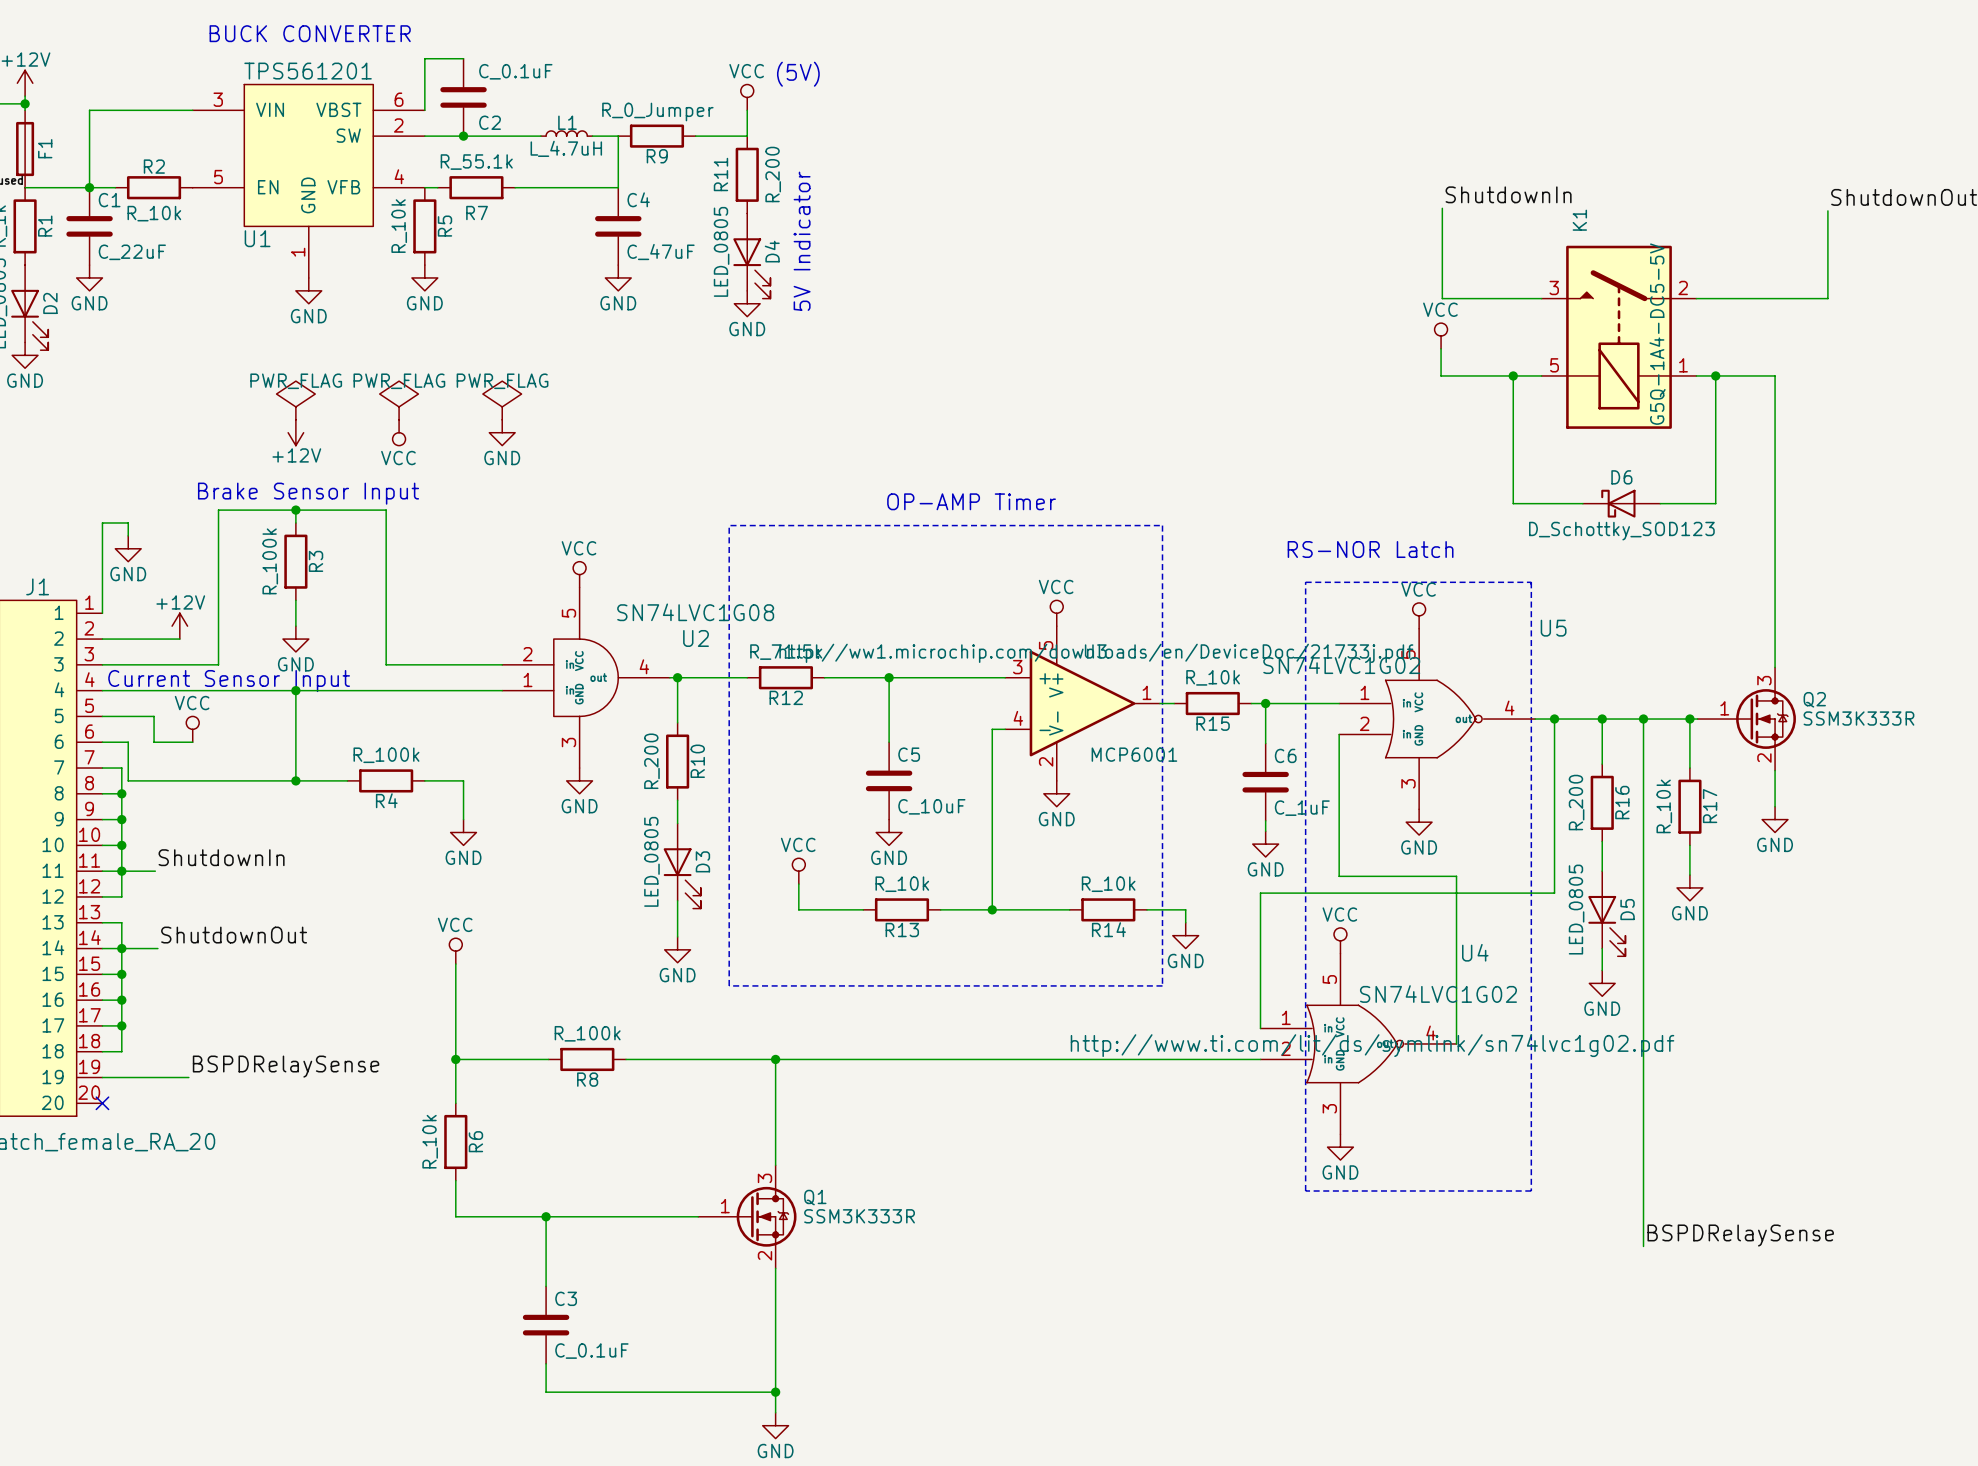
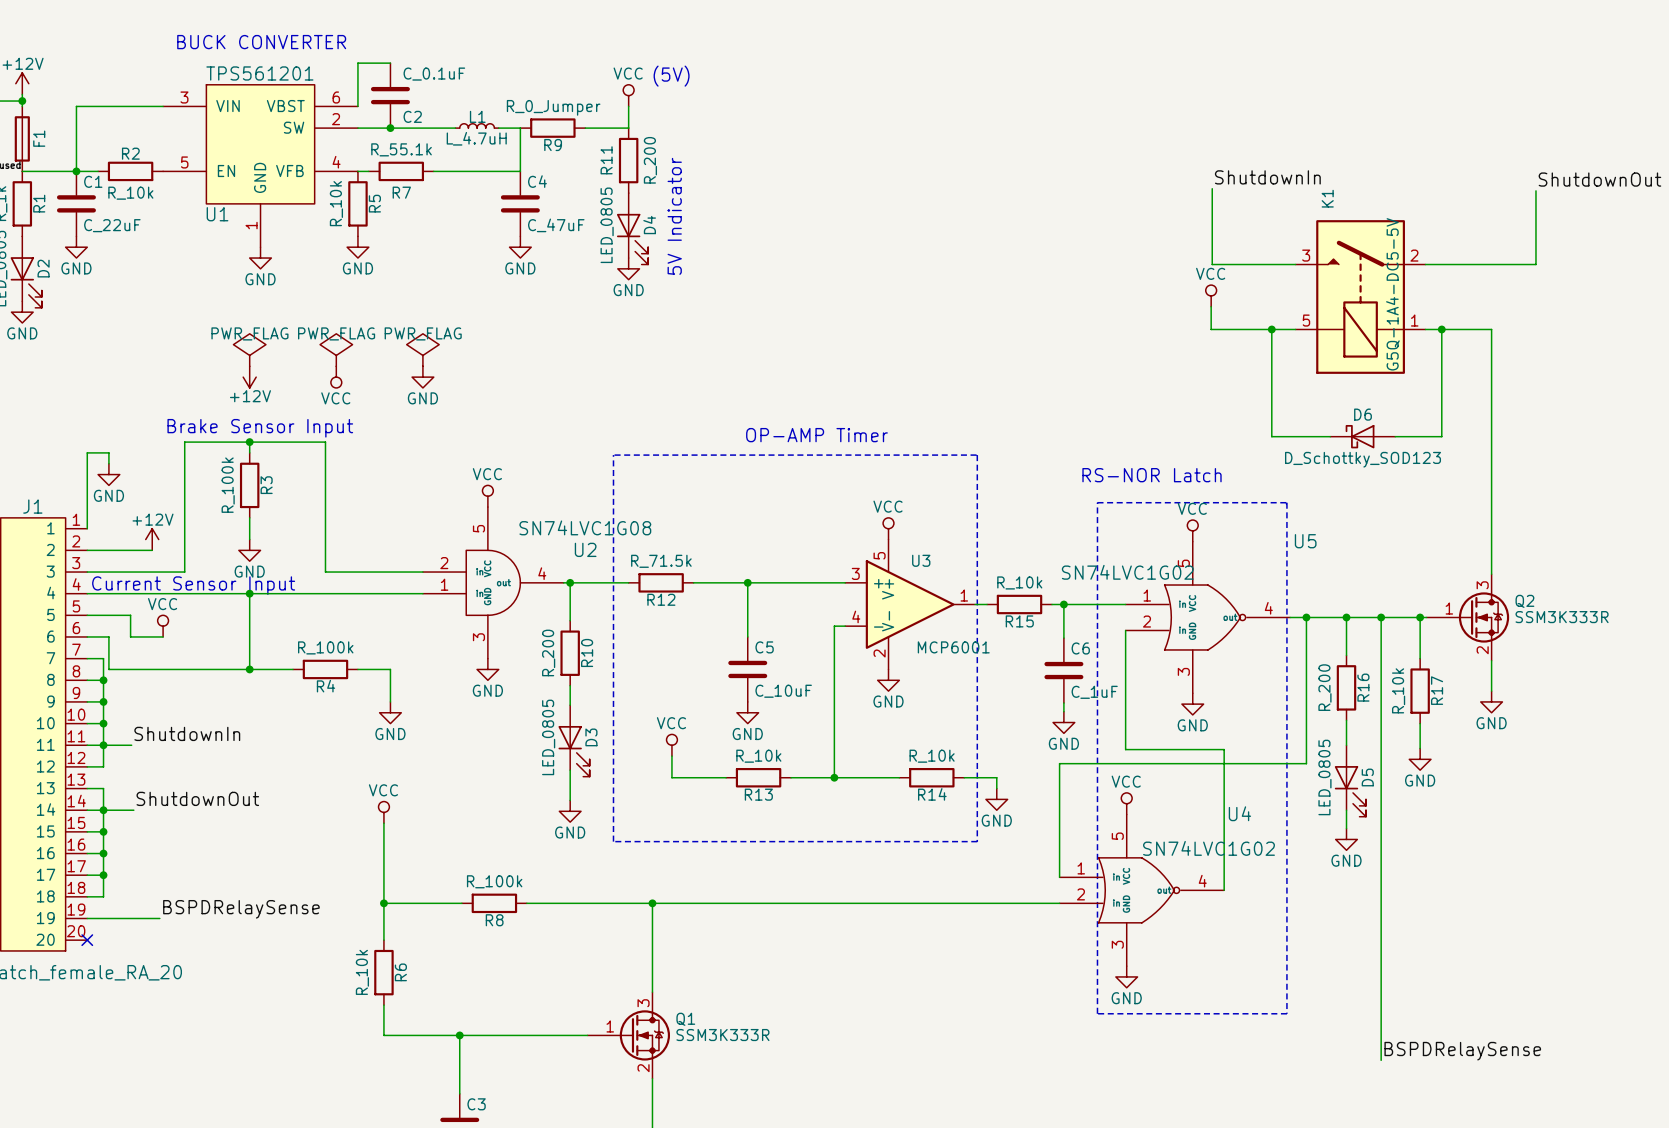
U3 text: http://ww1.microchip.com/downloads/en/DeviceDoc/21733j.pdf (1096, 653) -> none
U4 text: http://www.ti.com/lit/ds/symlink/sn74lvc1g02.pdf (1372, 1045) -> none

